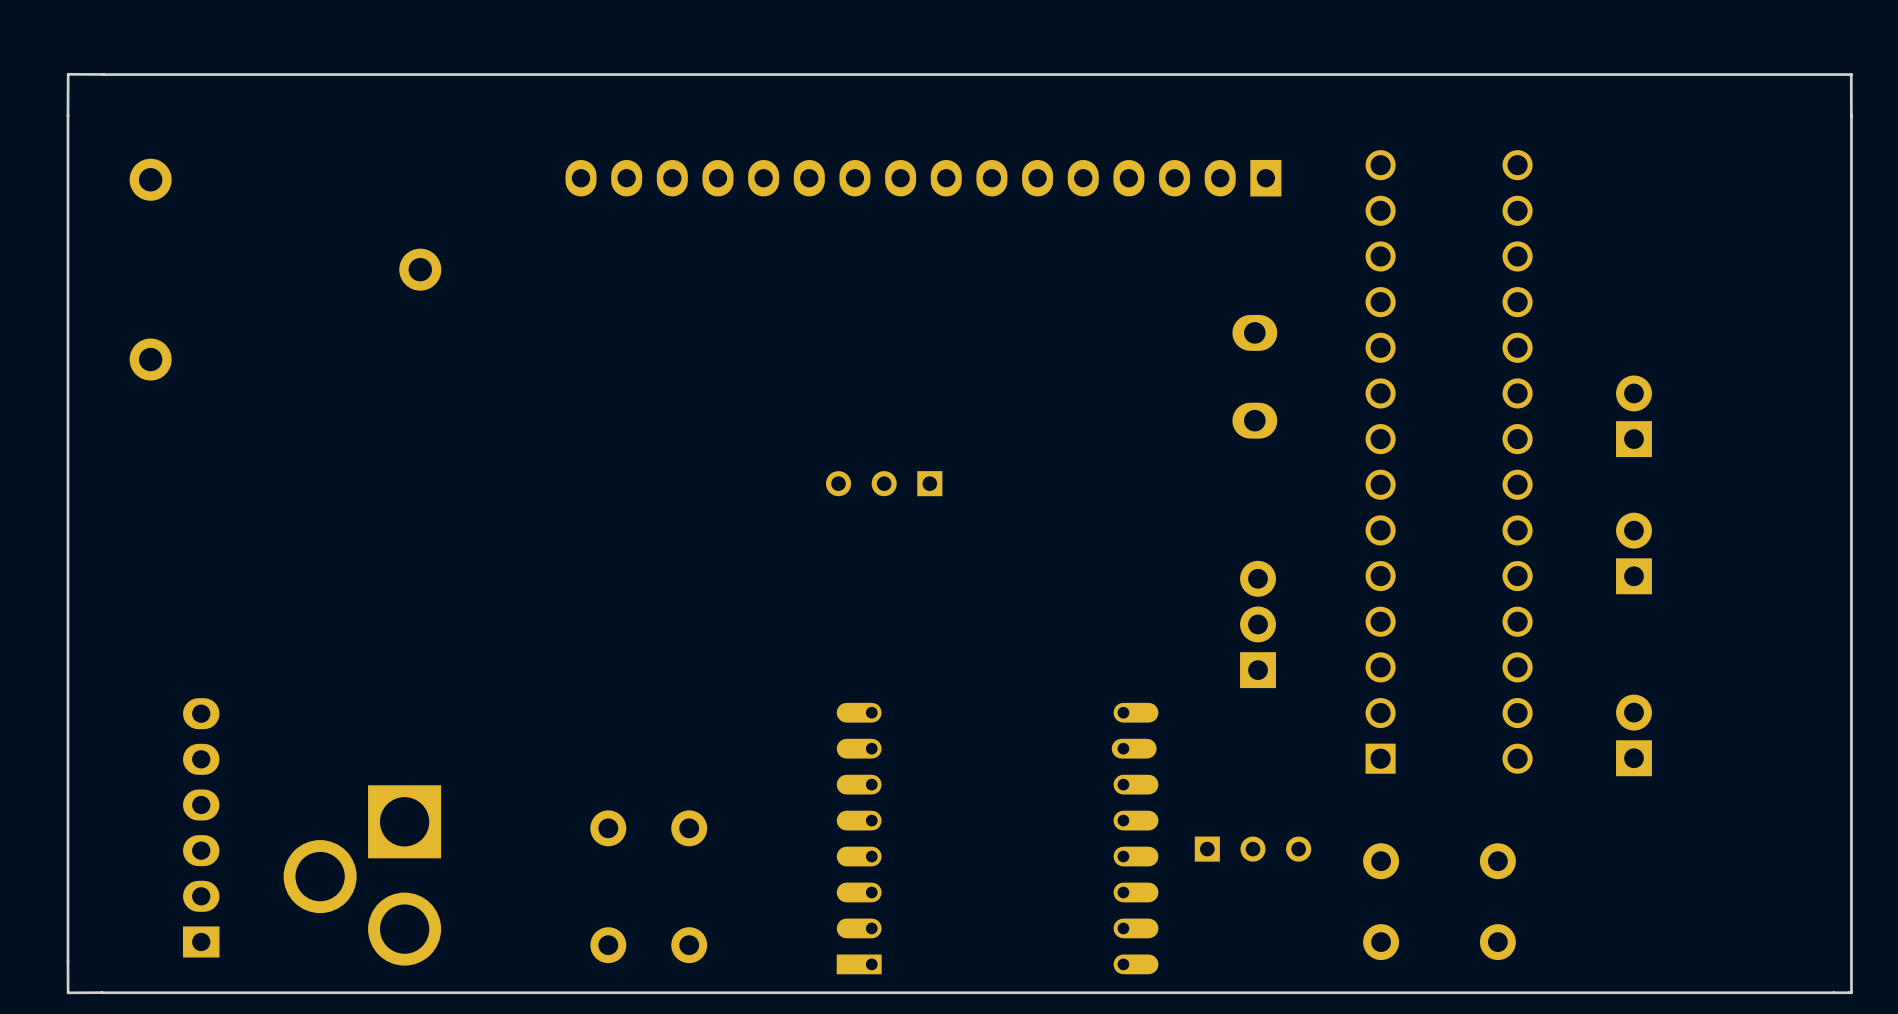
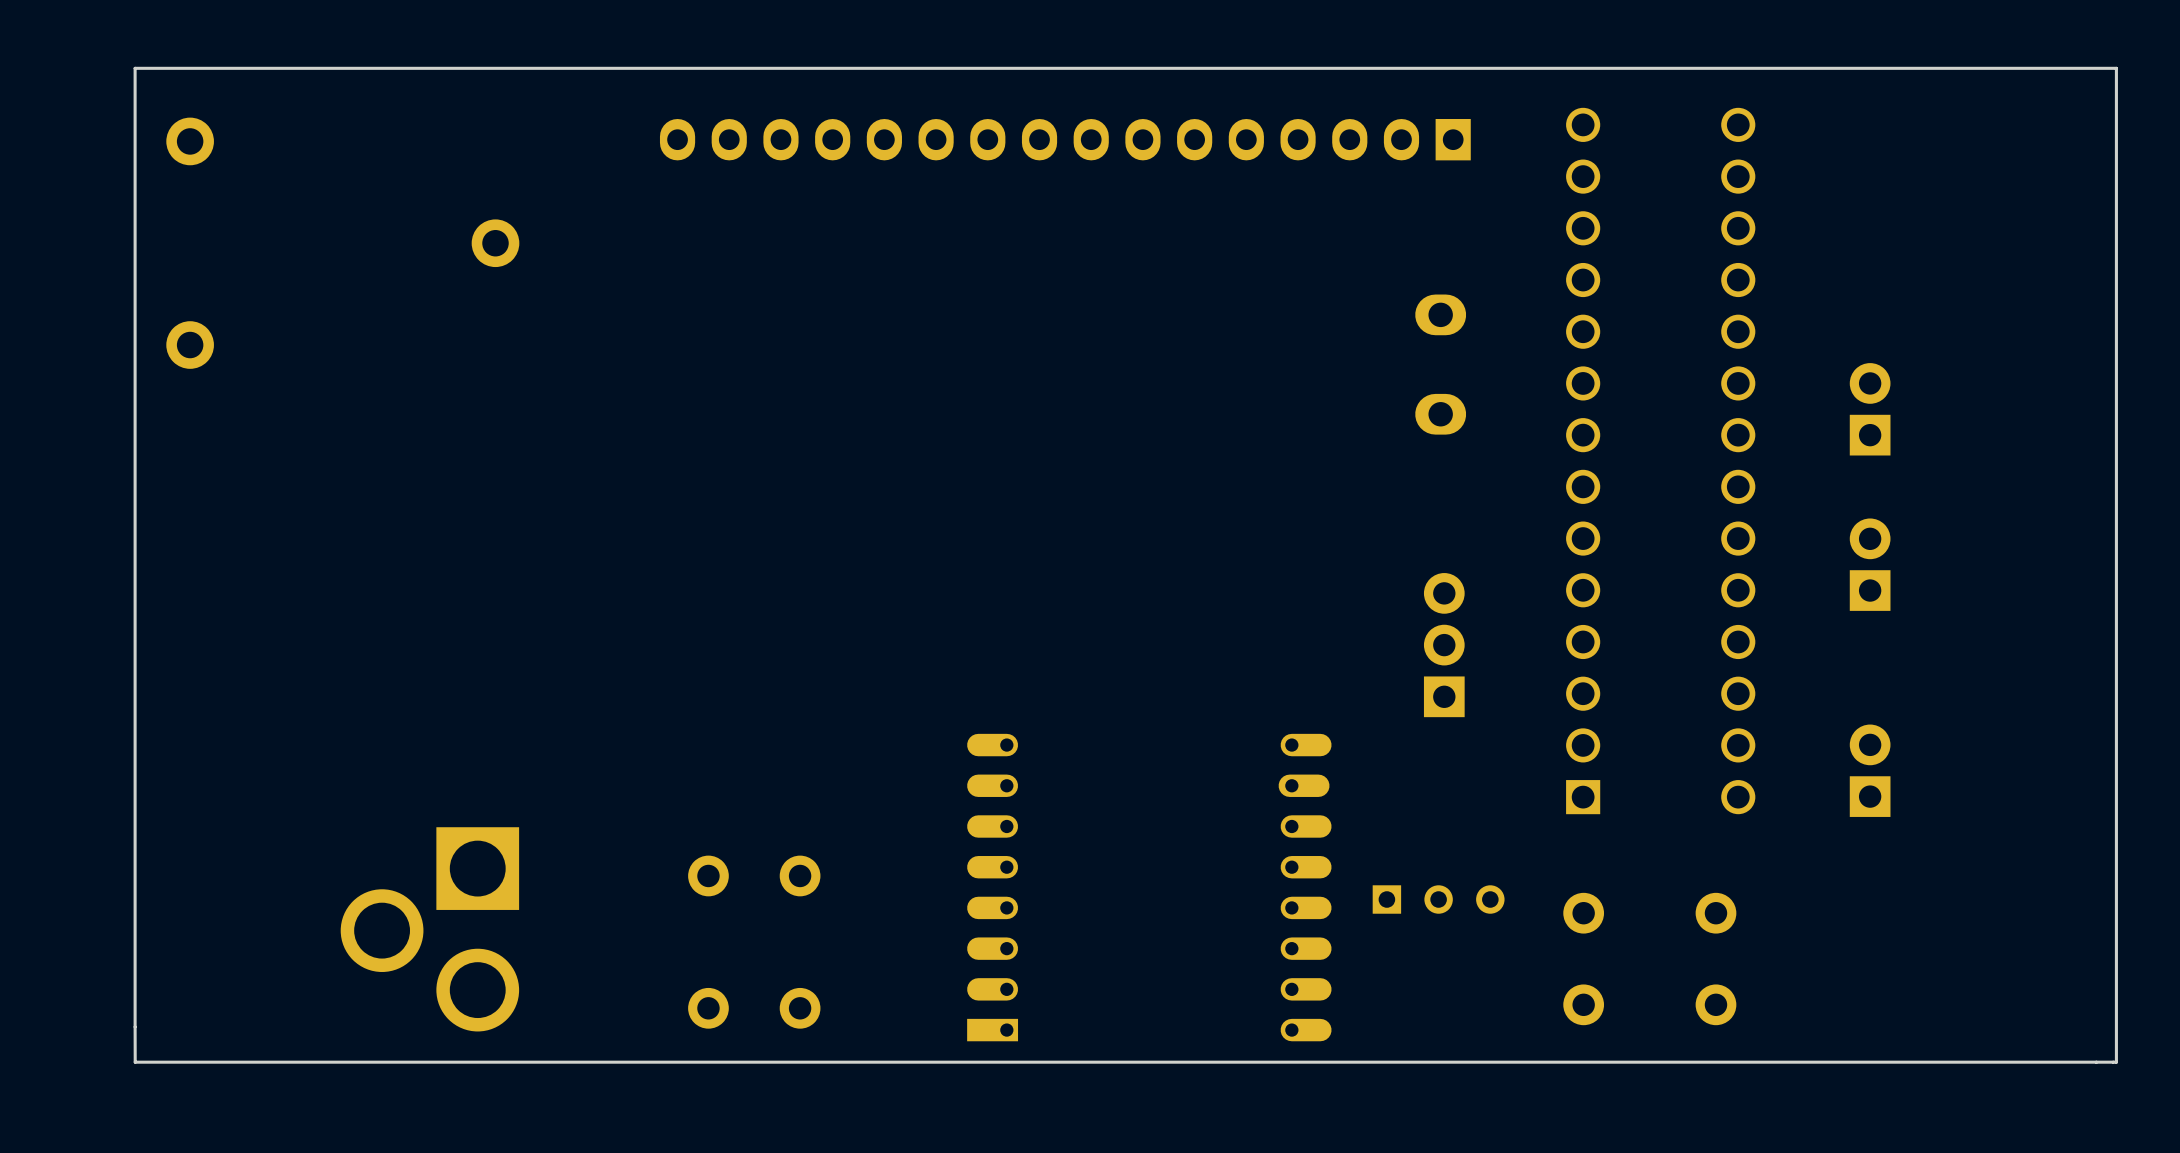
board edge: (103, 74) (68, 74) (68, 115) -> none
board edge: (1851, 74) (1851, 116) -> none
board edge: (1851, 74) (102, 74) -> none
board edge: (68, 115) (68, 992) -> none
part: (884, 483) -> none
part: (201, 827) -> none
board edge: (101, 992) (68, 992) -> (135, 1062) (135, 68) (2116, 68)

